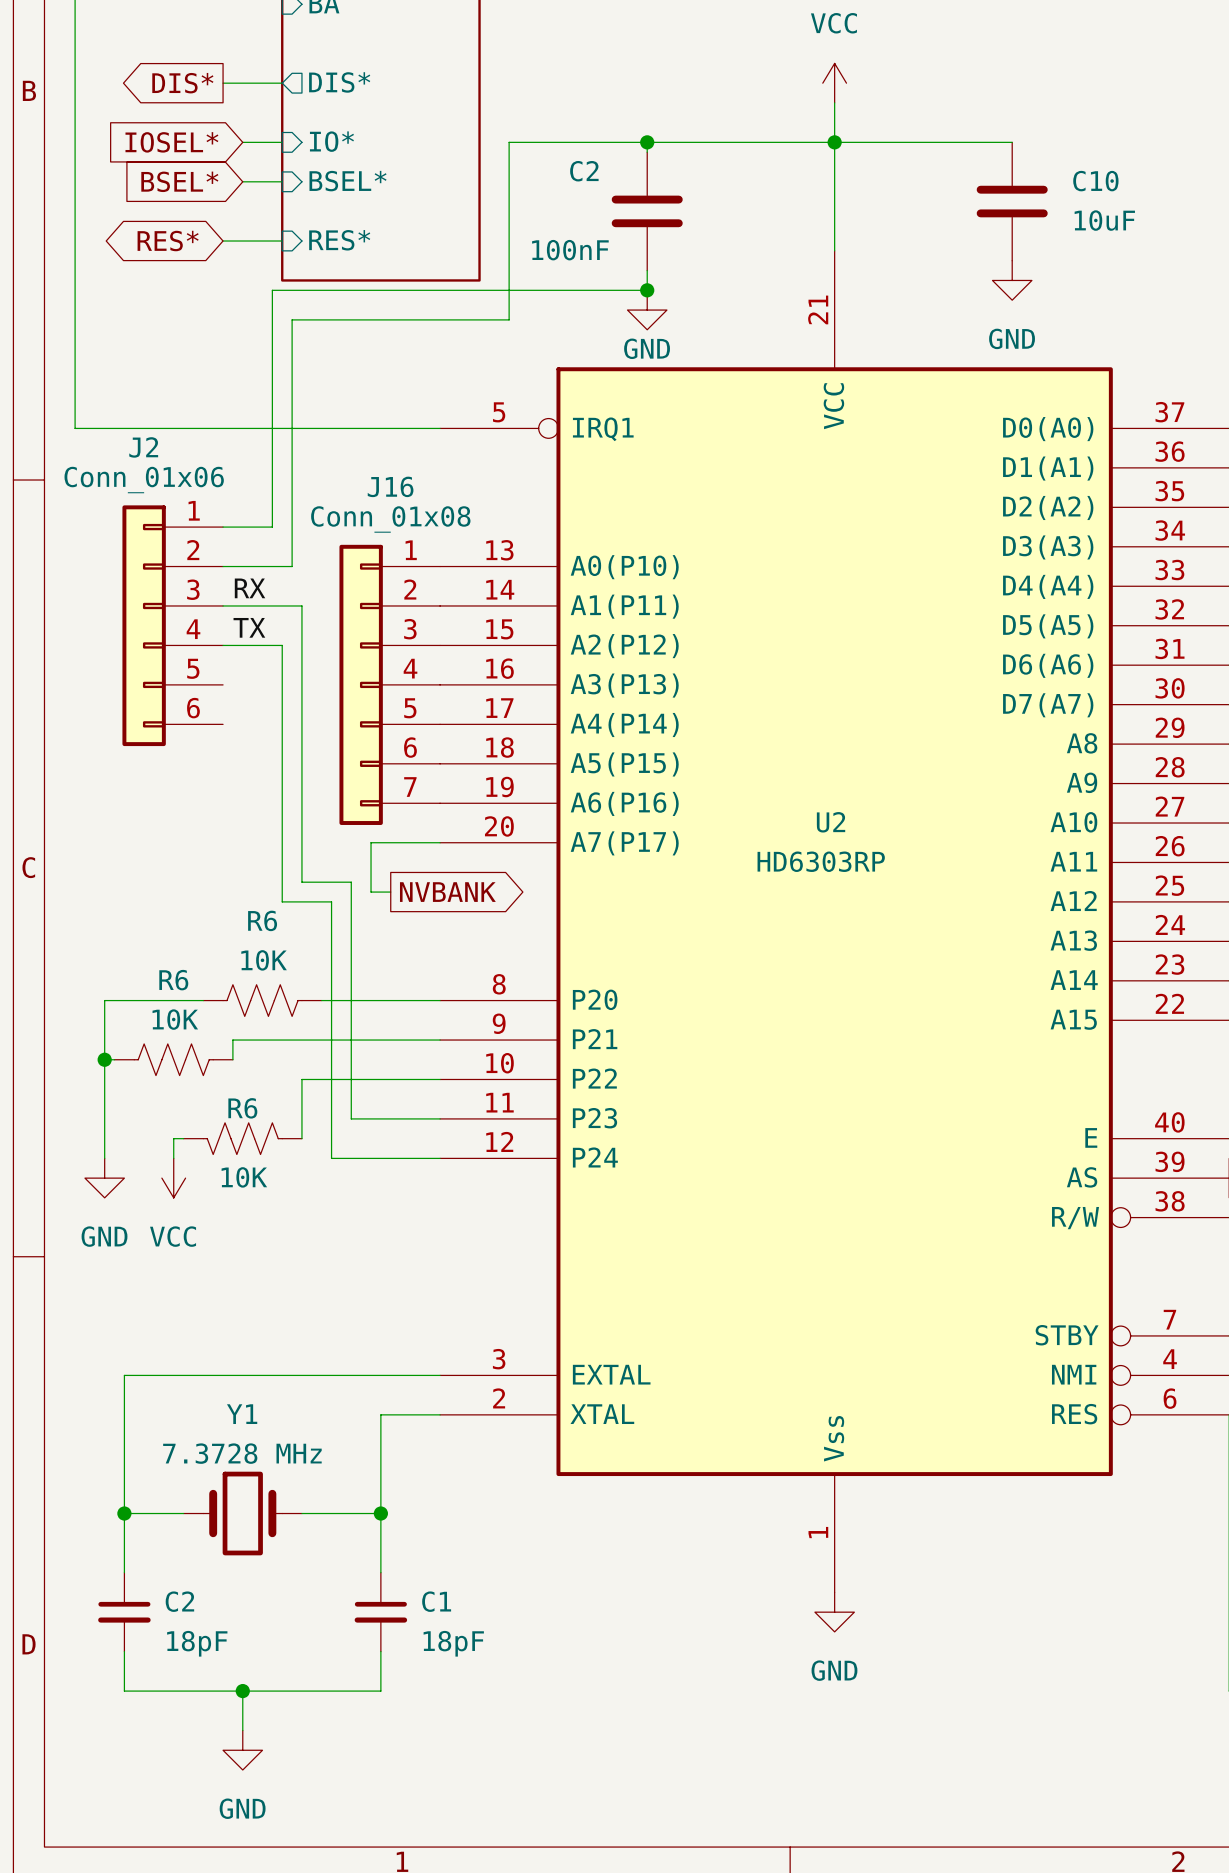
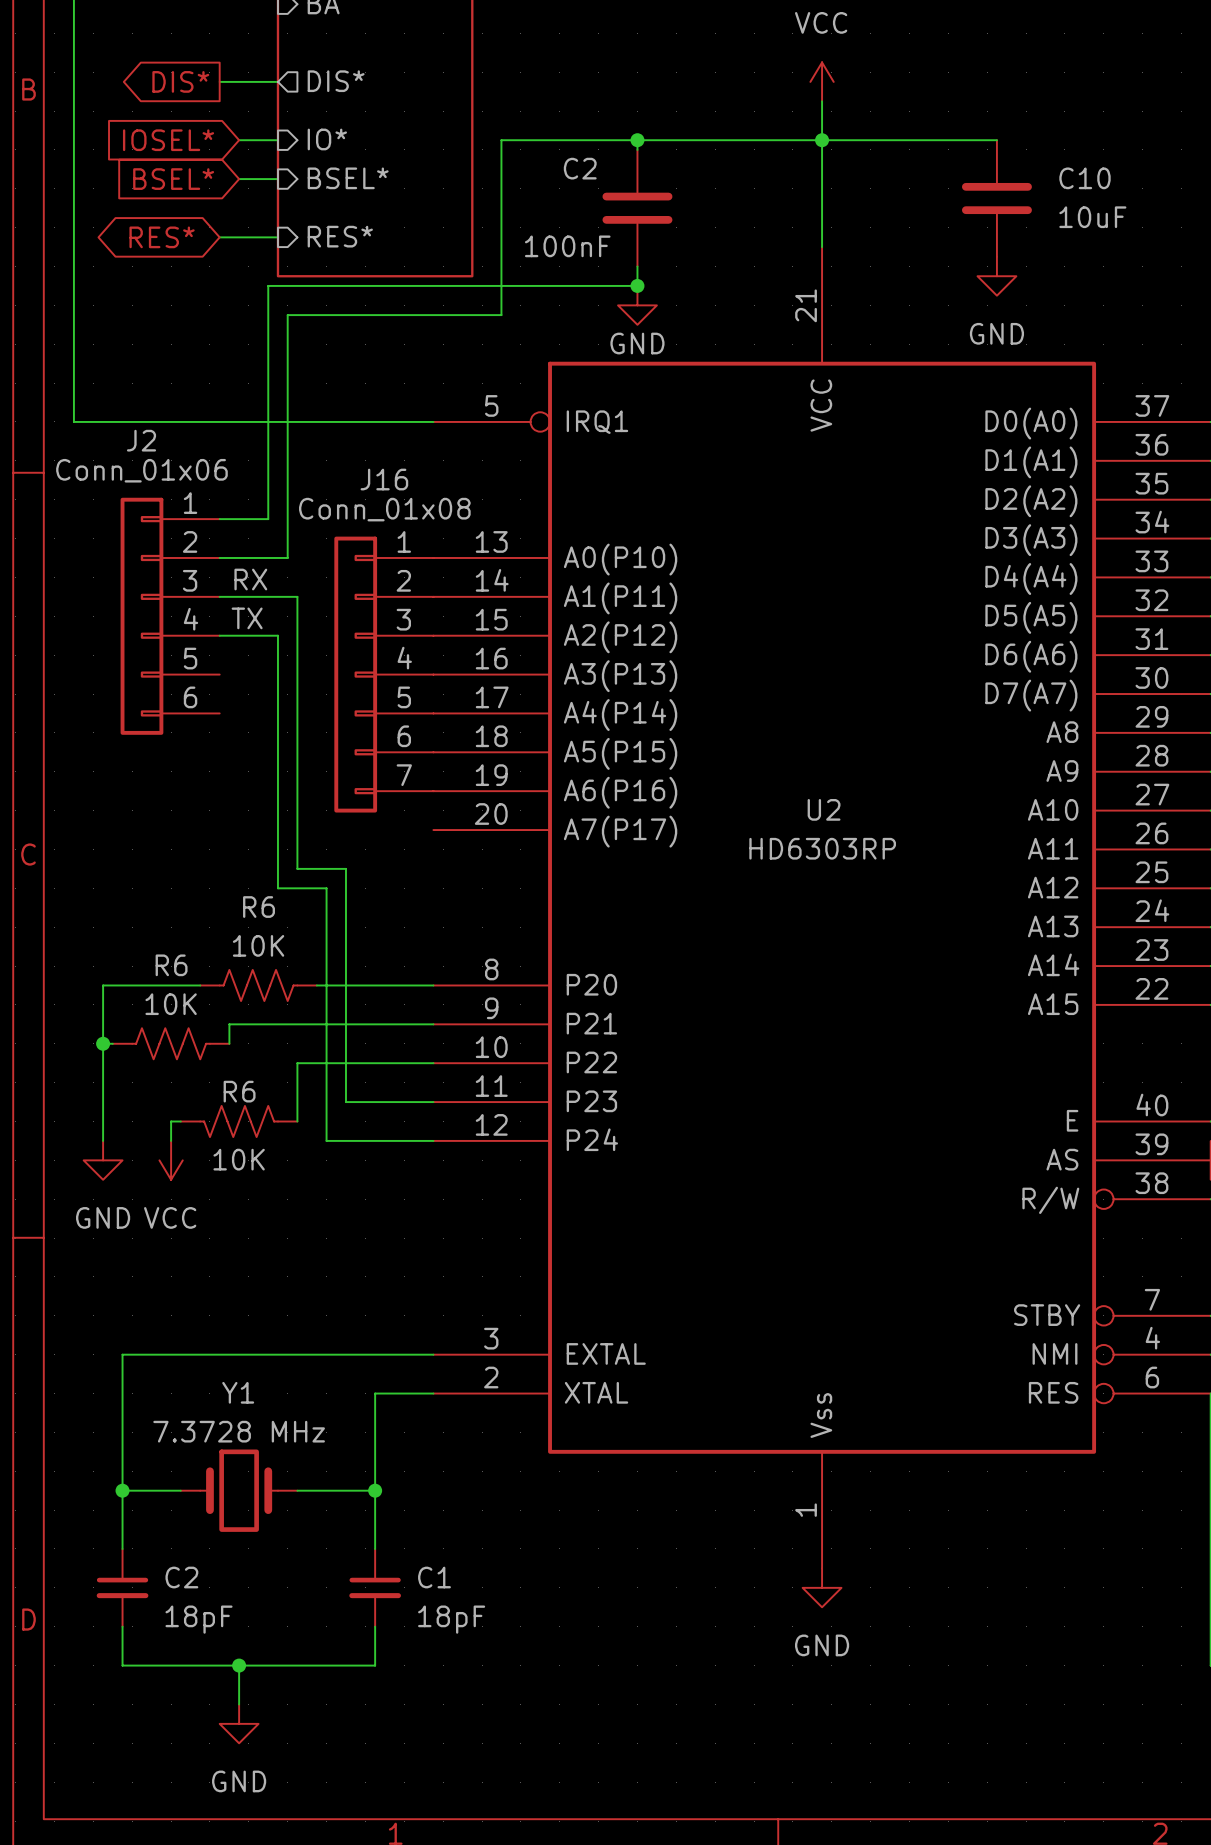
wire: (440, 842) (371, 842) (371, 892) (390, 892) -> none
global label: NVBANK (447, 892) -> none

